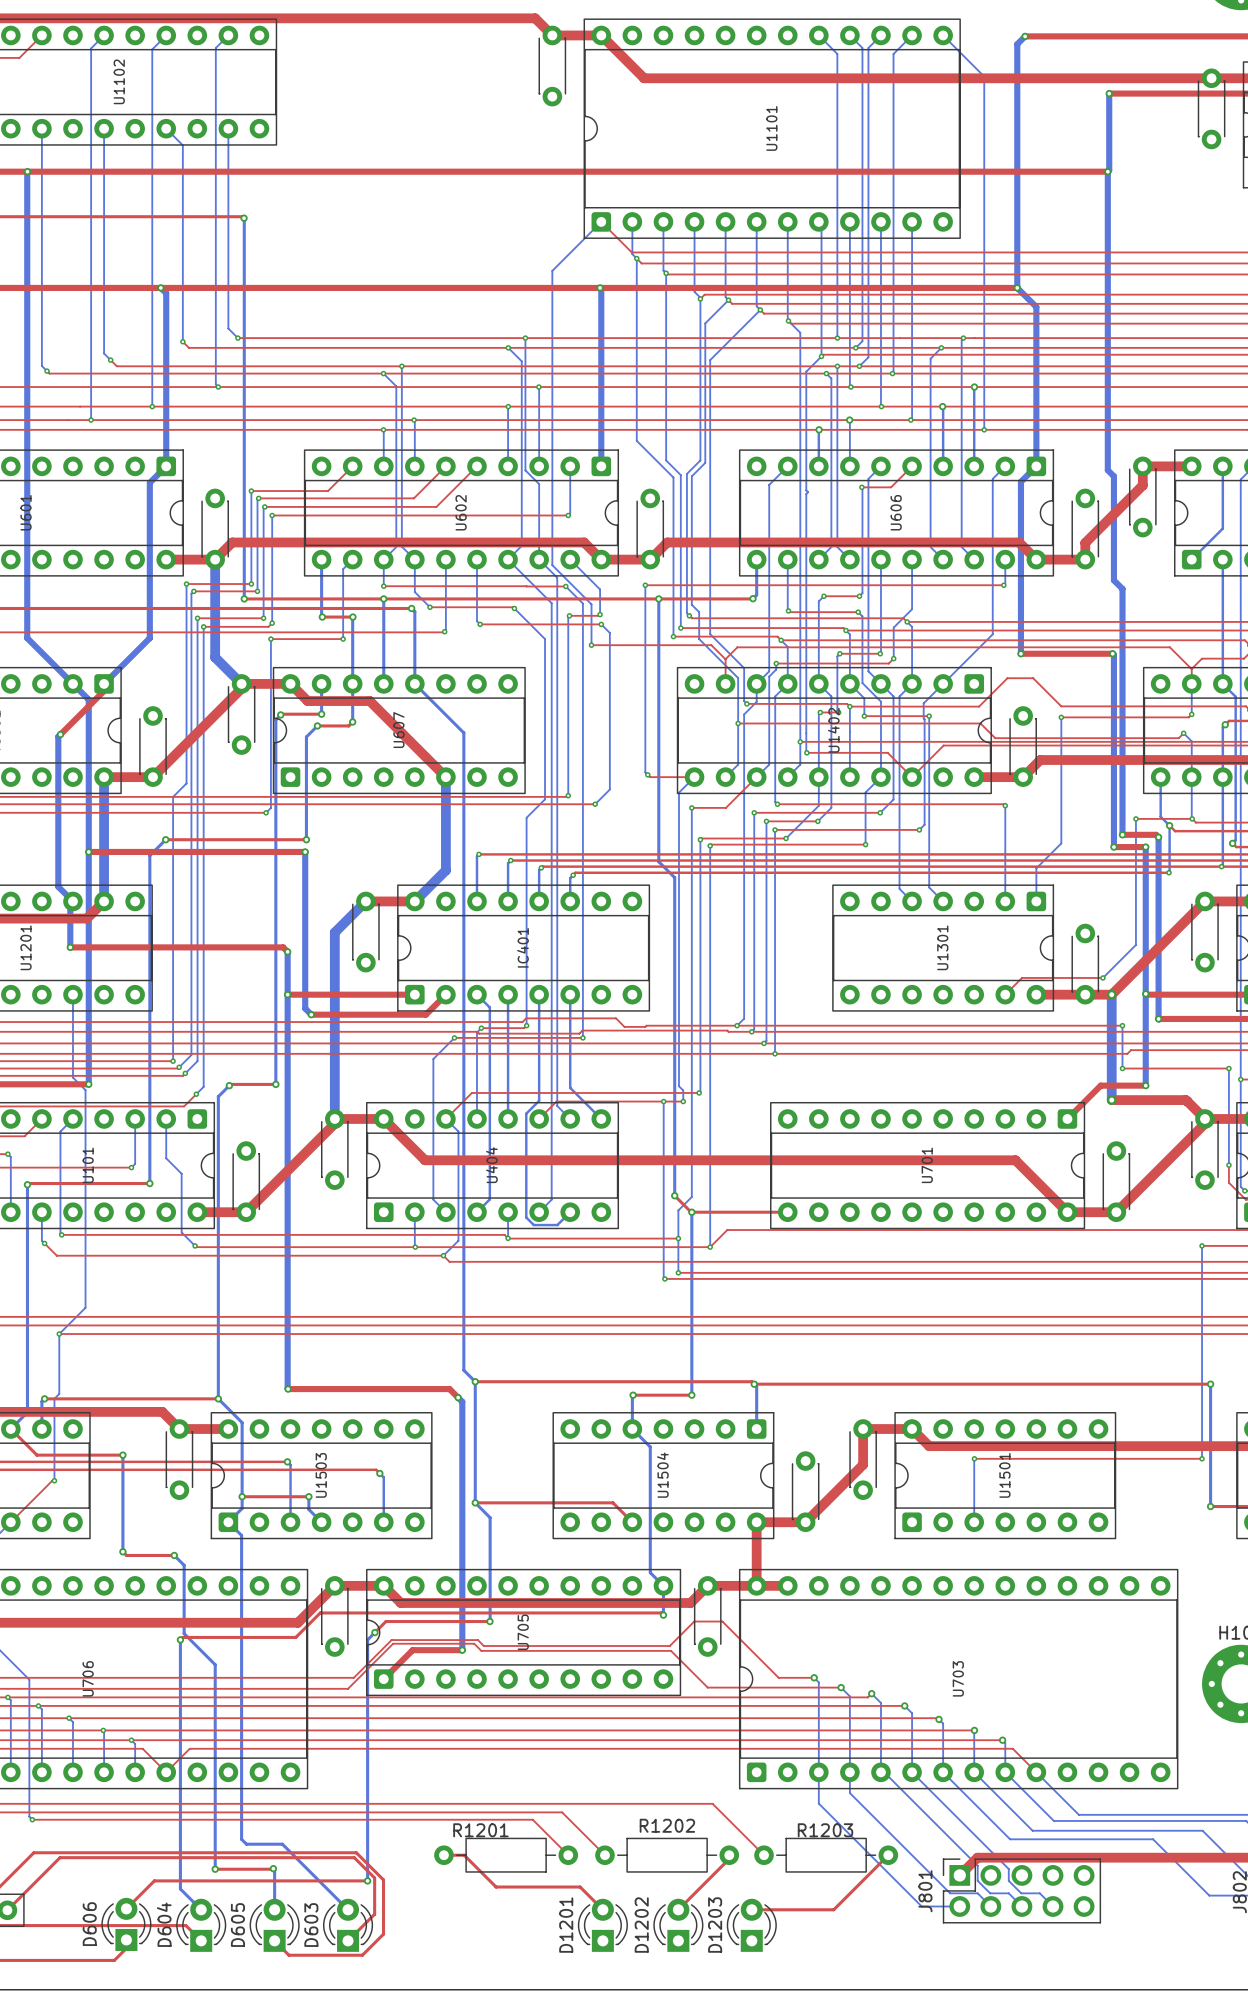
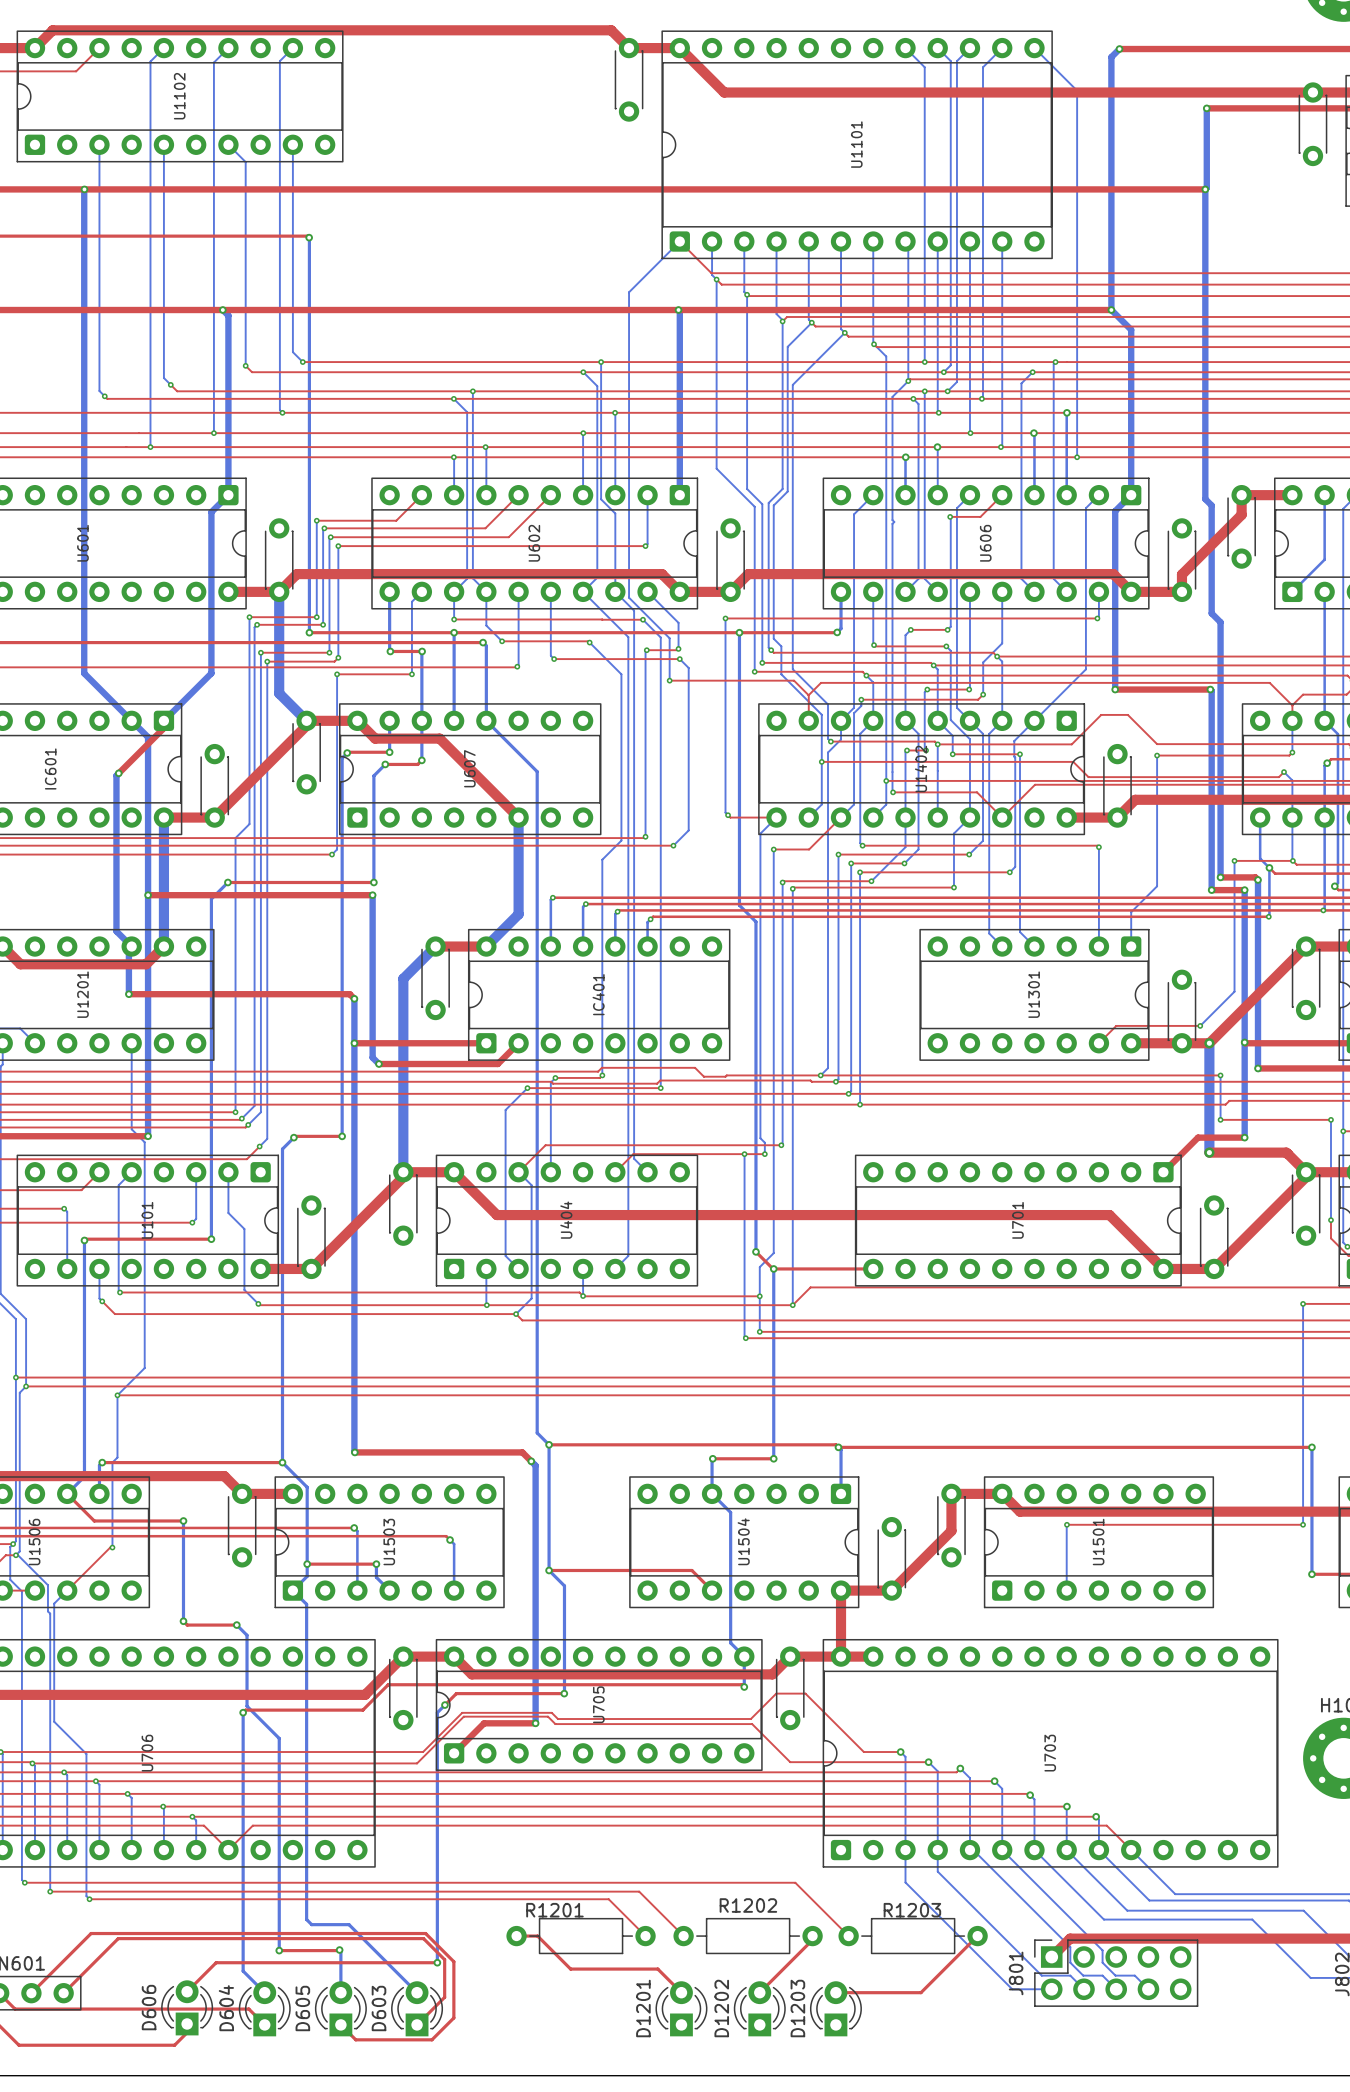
bottom track: (476, 994) (489, 1007) (489, 1199) (476, 1212) -> none
bottom track: (508, 994) (508, 1118) -> none
bottom track: (539, 994) (539, 1100) (526, 1113) (526, 1217) (533, 1225) (557, 1225) (570, 1212) -> none
bottom track: (570, 994) (570, 1087) (601, 1118) -> none

